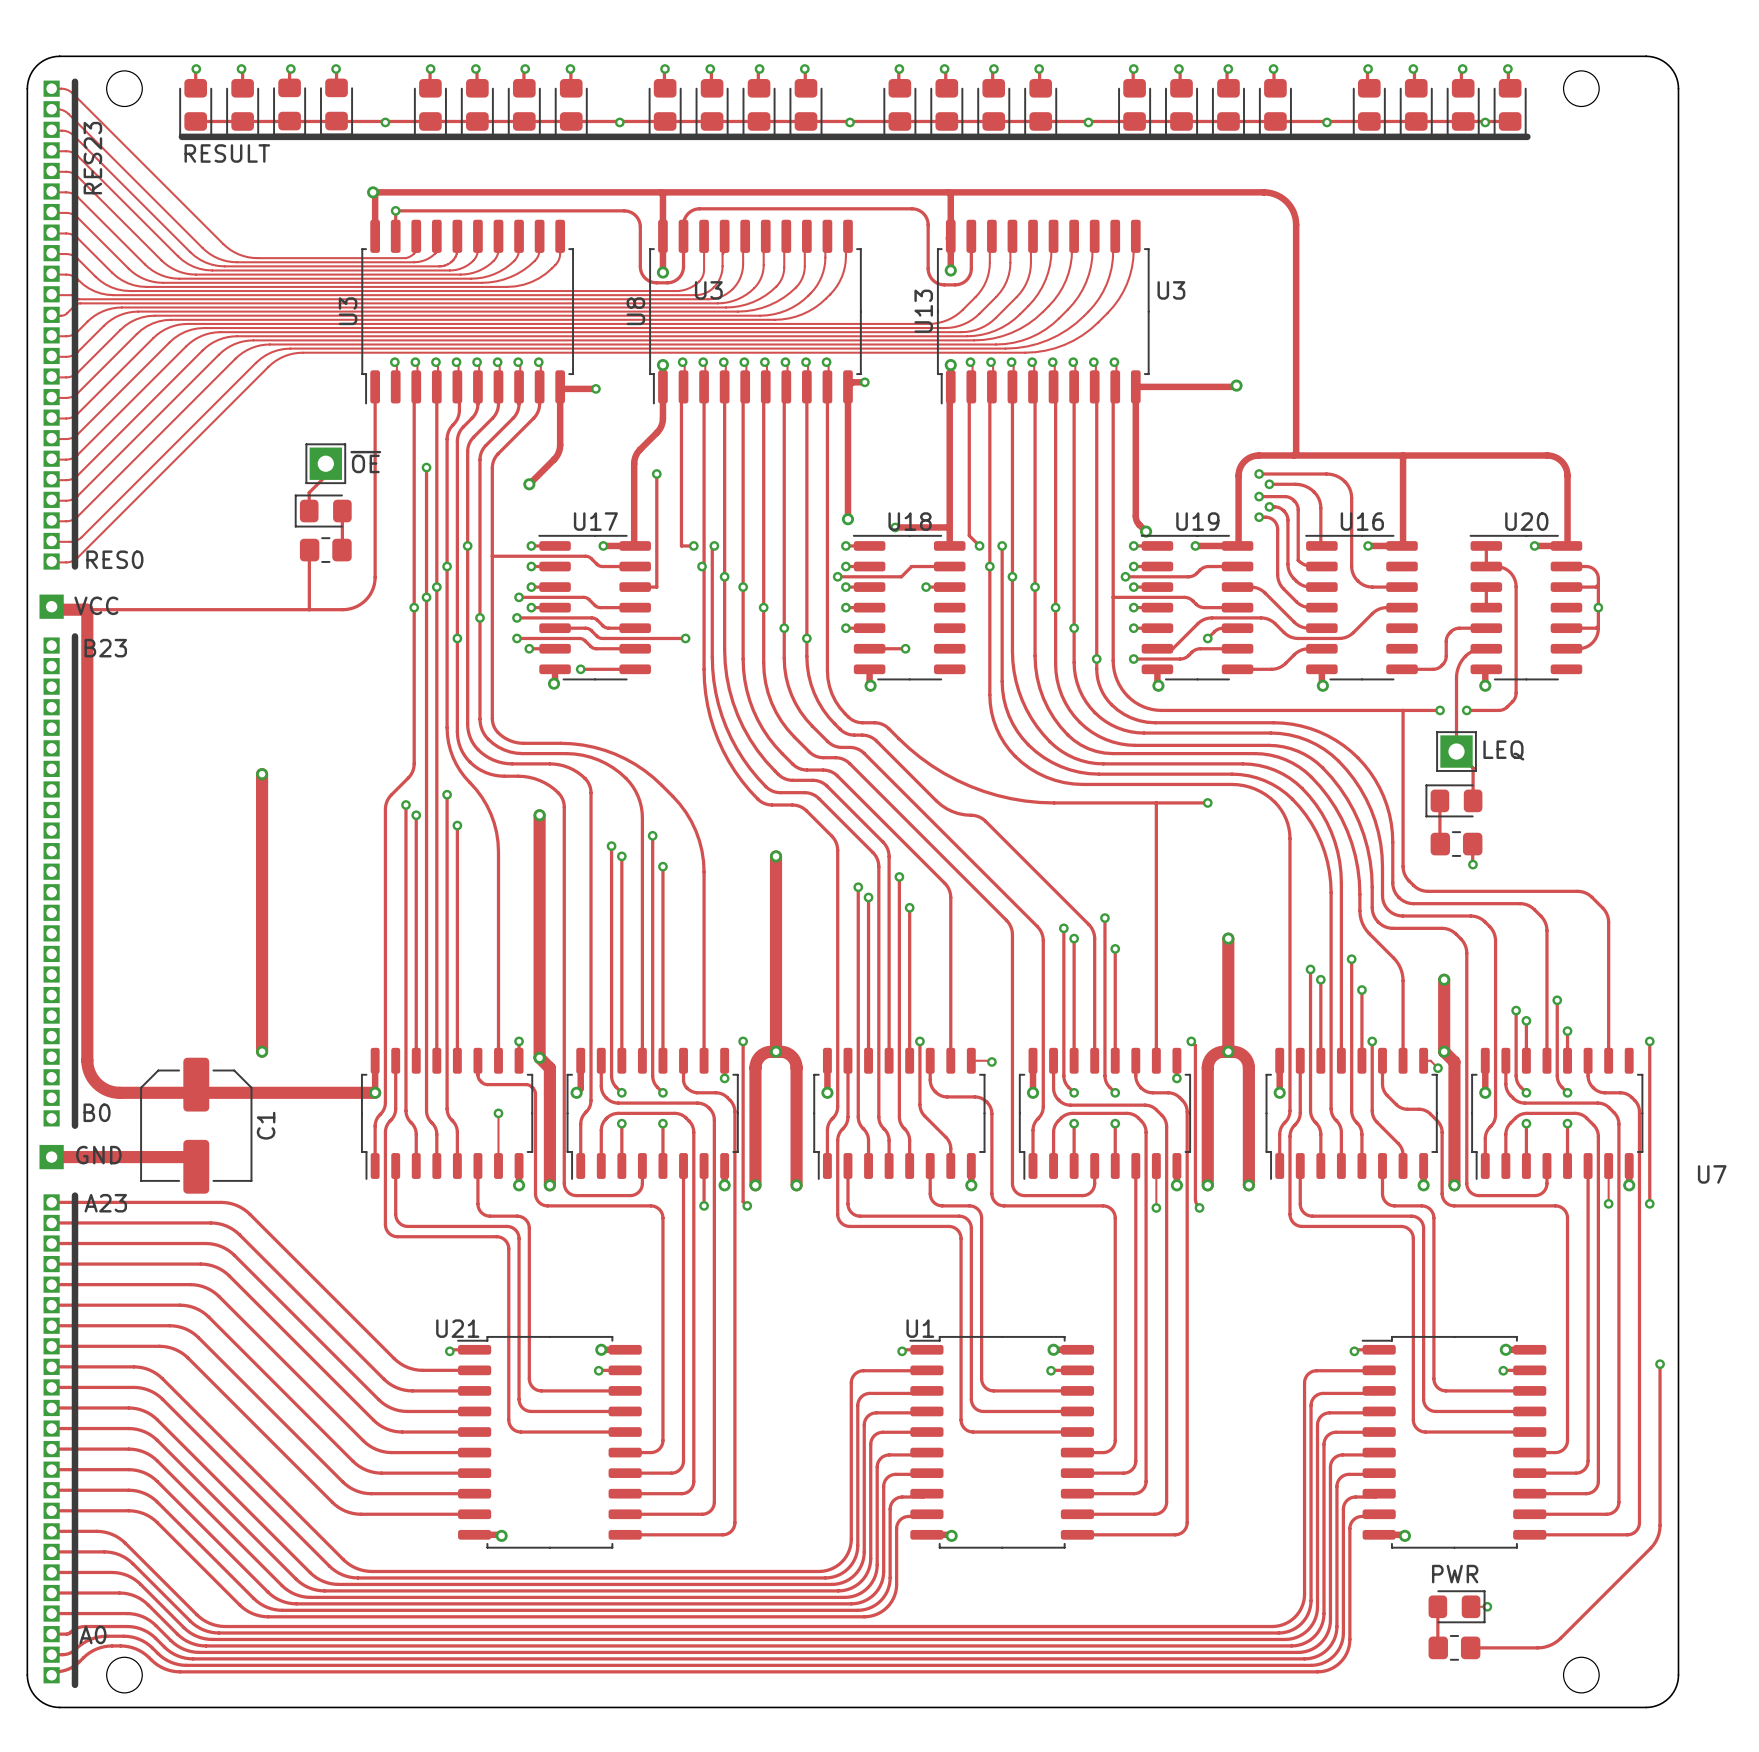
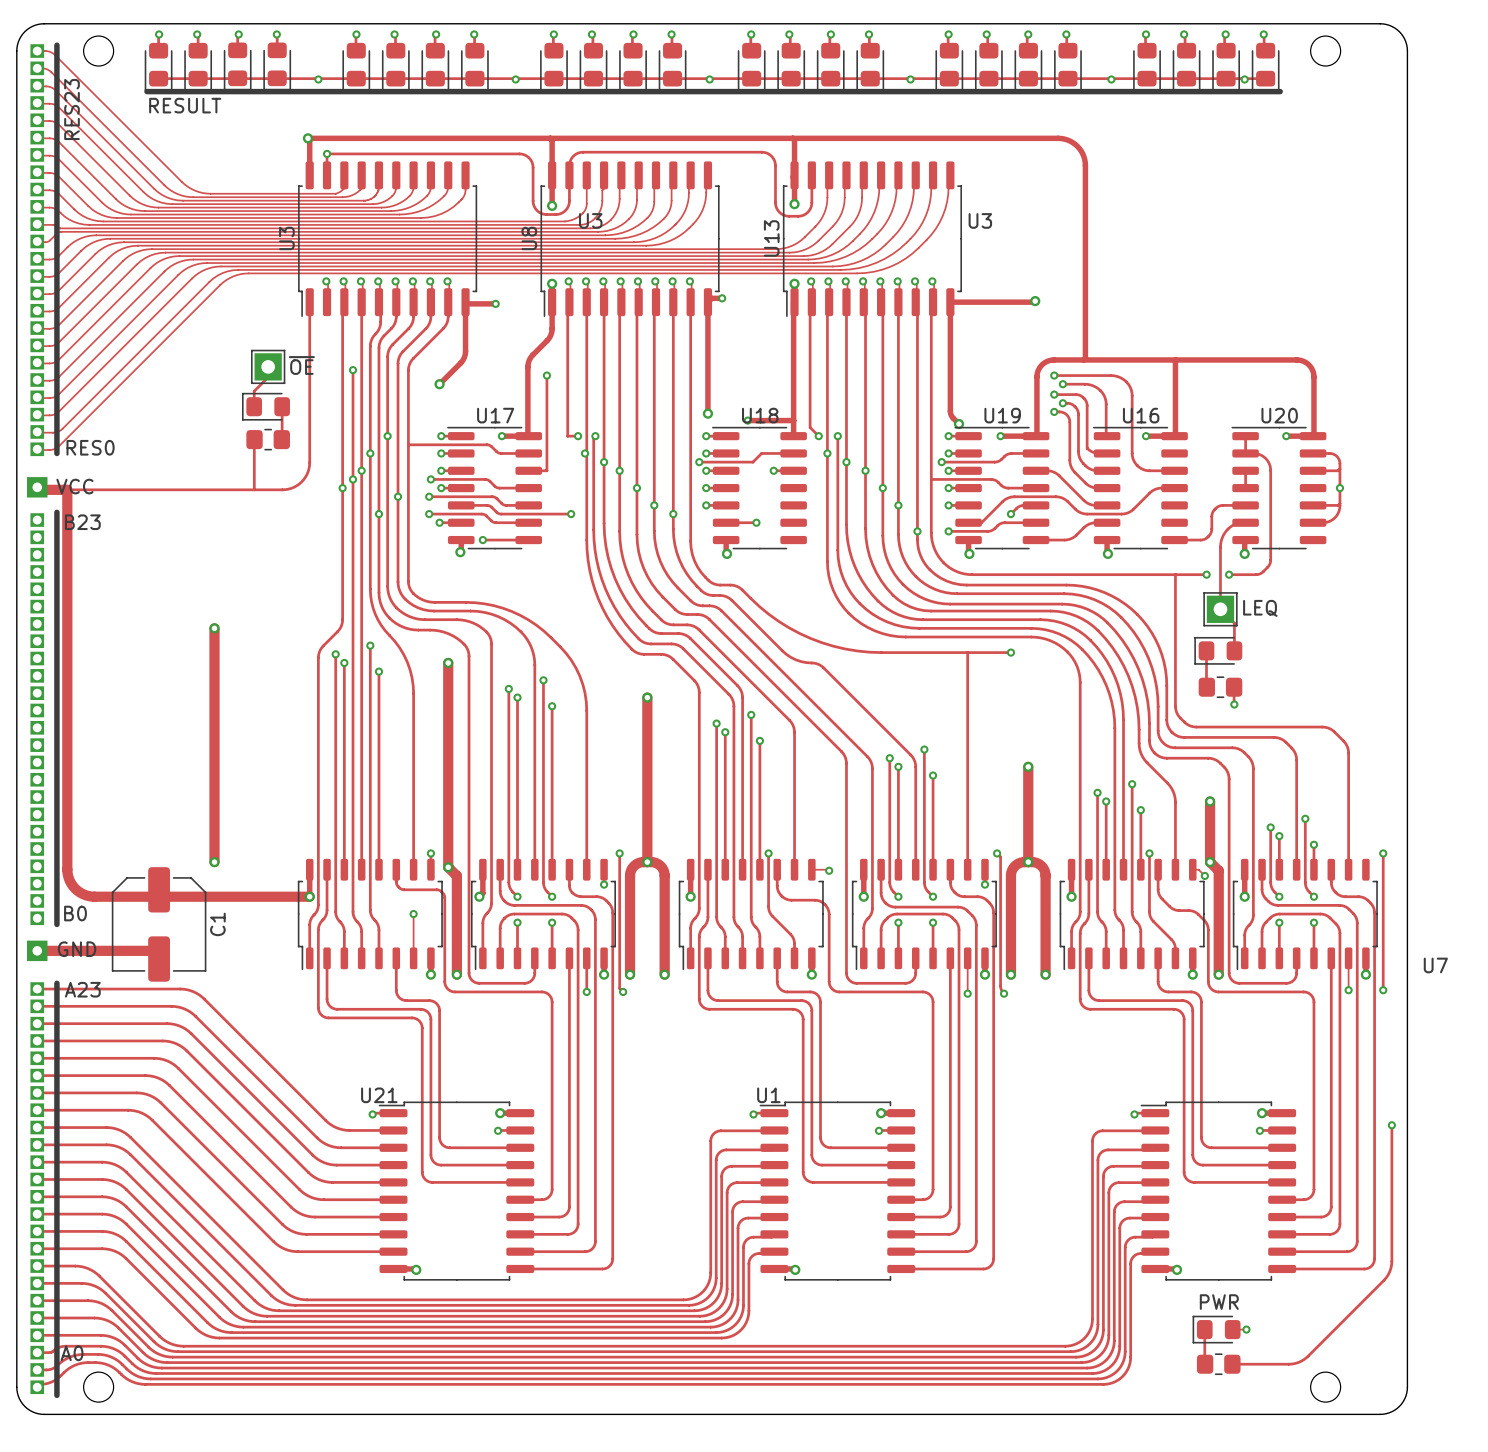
part rotation: 0° (1457, 1606) -> 180° (1216, 1329)

